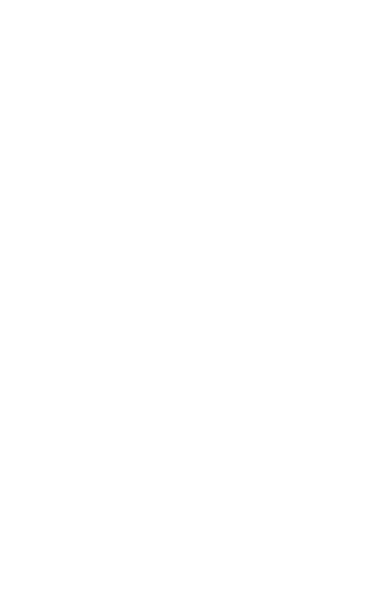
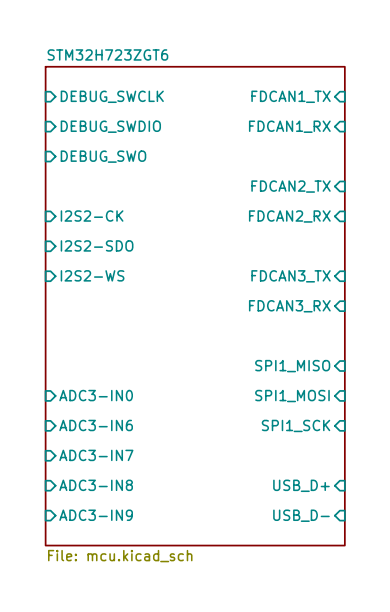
sheet pin: none -> DEBUG_SWCLK (112, 96)
sheet pin: none -> FDCAN1_TX (291, 96)
sheet pin: none -> DEBUG_SWDIO (110, 126)
sheet pin: none -> FDCAN1_RX (289, 126)
sheet pin: none -> DEBUG_SWO (103, 156)
sheet pin: none -> FDCAN2_TX (291, 186)
sheet pin: none -> I2S2-CK (92, 216)
sheet pin: none -> FDCAN2_RX (289, 216)
sheet pin: none -> I2S2-SDO (97, 245)
sheet pin: none -> I2S2-WS (92, 275)
sheet pin: none -> FDCAN3_TX (291, 276)
sheet STM32H723ZGT6: none -> File: mcu.kicad_sch (195, 306)
sheet pin: none -> FDCAN3_RX (289, 306)
sheet pin: none -> SPI1_MISO (292, 366)
sheet pin: none -> ADC3-IN0 (96, 395)
sheet pin: none -> SPI1_MOSI (292, 396)
sheet pin: none -> ADC3-IN6 (96, 425)
sheet pin: none -> SPI1_SCK (296, 425)
sheet pin: none -> ADC3-IN7 (96, 455)
sheet pin: none -> ADC3-IN8 (96, 485)
sheet pin: none -> USB_D+ (301, 485)
sheet pin: none -> ADC3-IN9 (96, 515)
sheet pin: none -> USB_D- (301, 515)

